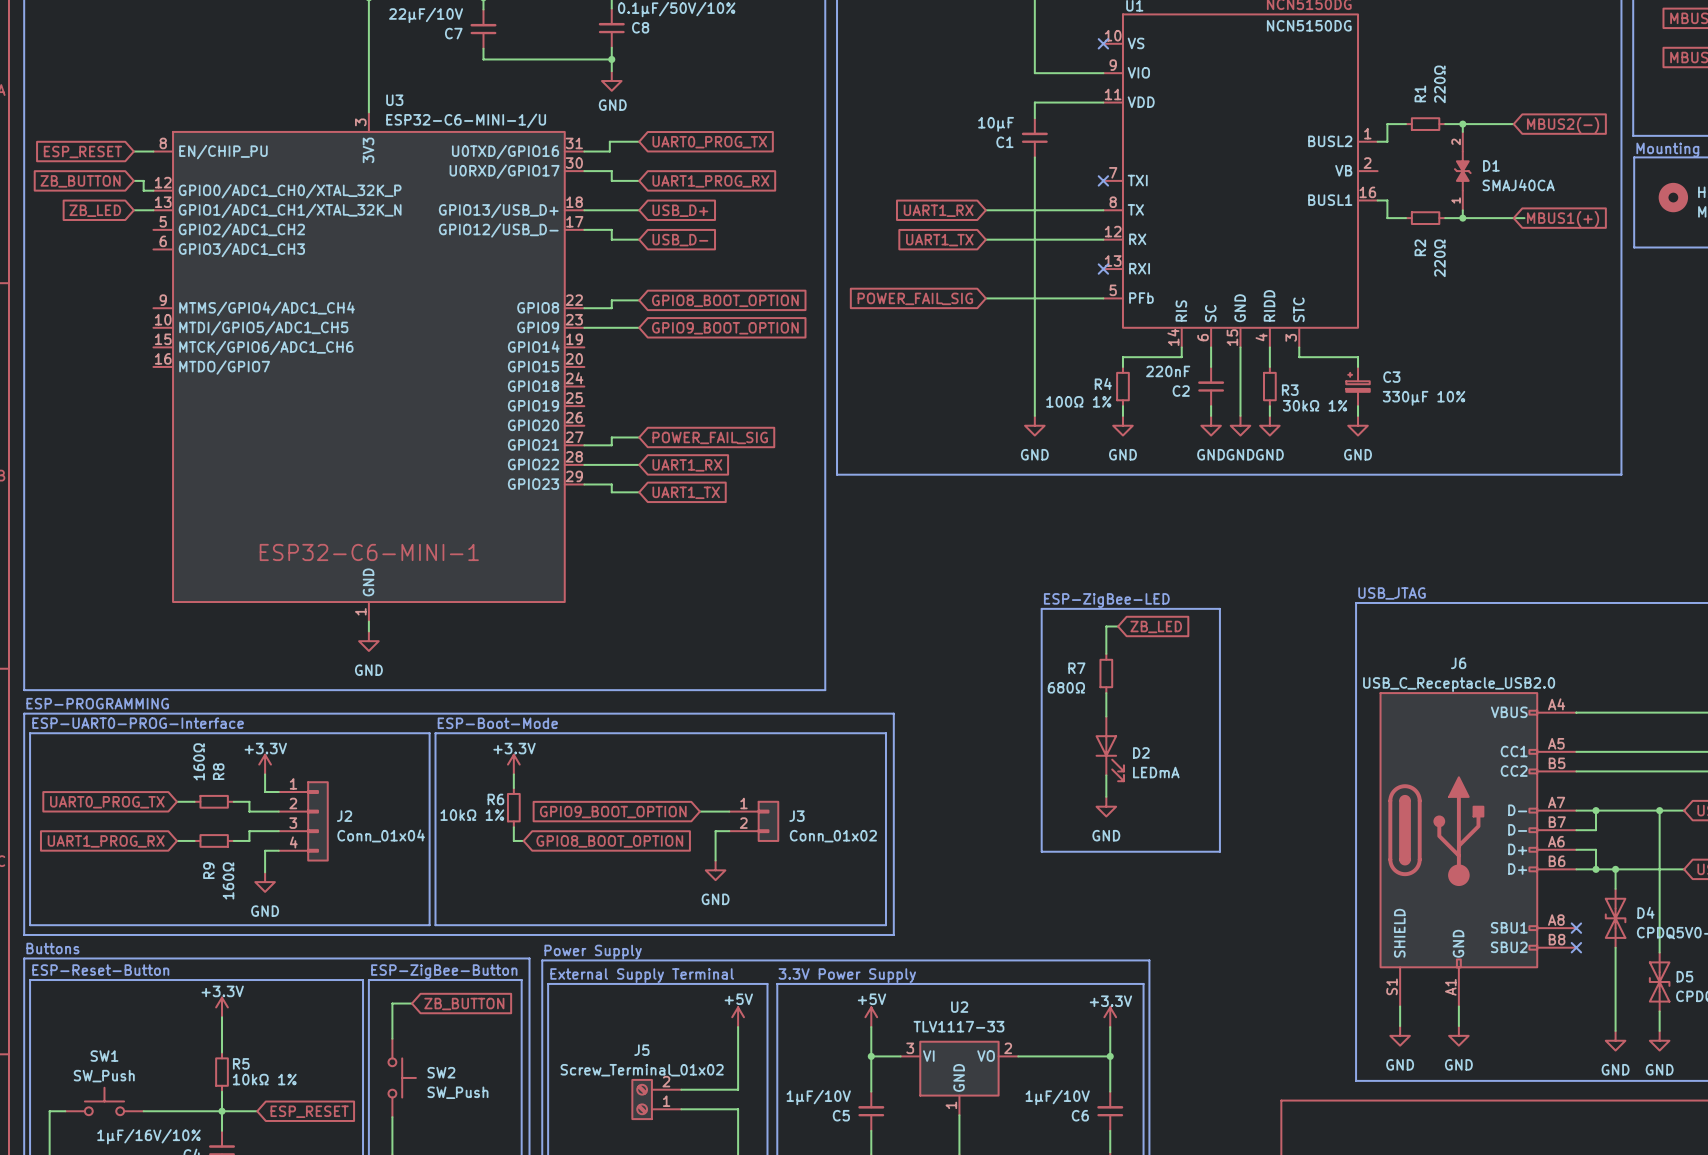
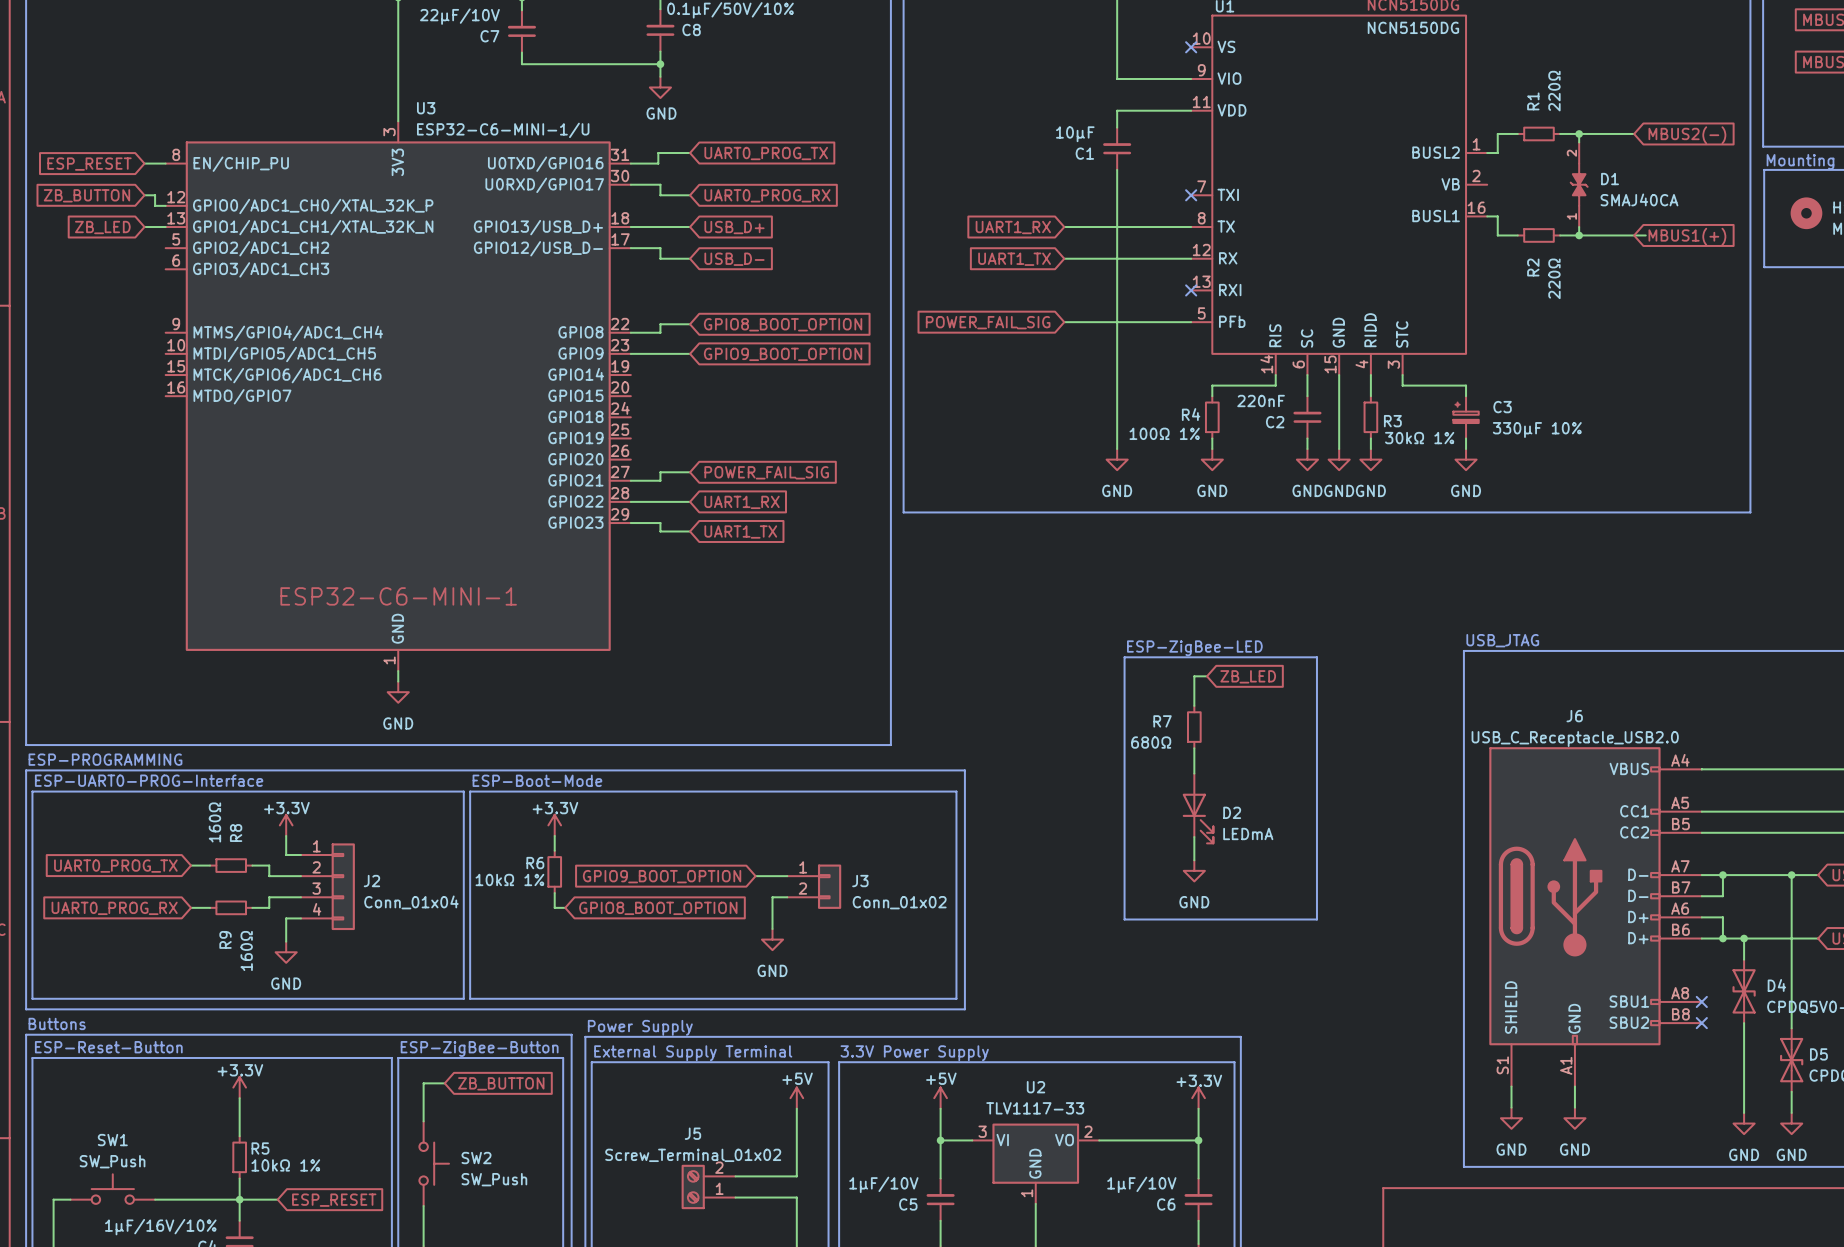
global label: UART1_PROG_RX (710, 181) -> UART0_PROG_RX (767, 195)
global label: UART1_PROG_RX (106, 841) -> UART0_PROG_RX (114, 908)

